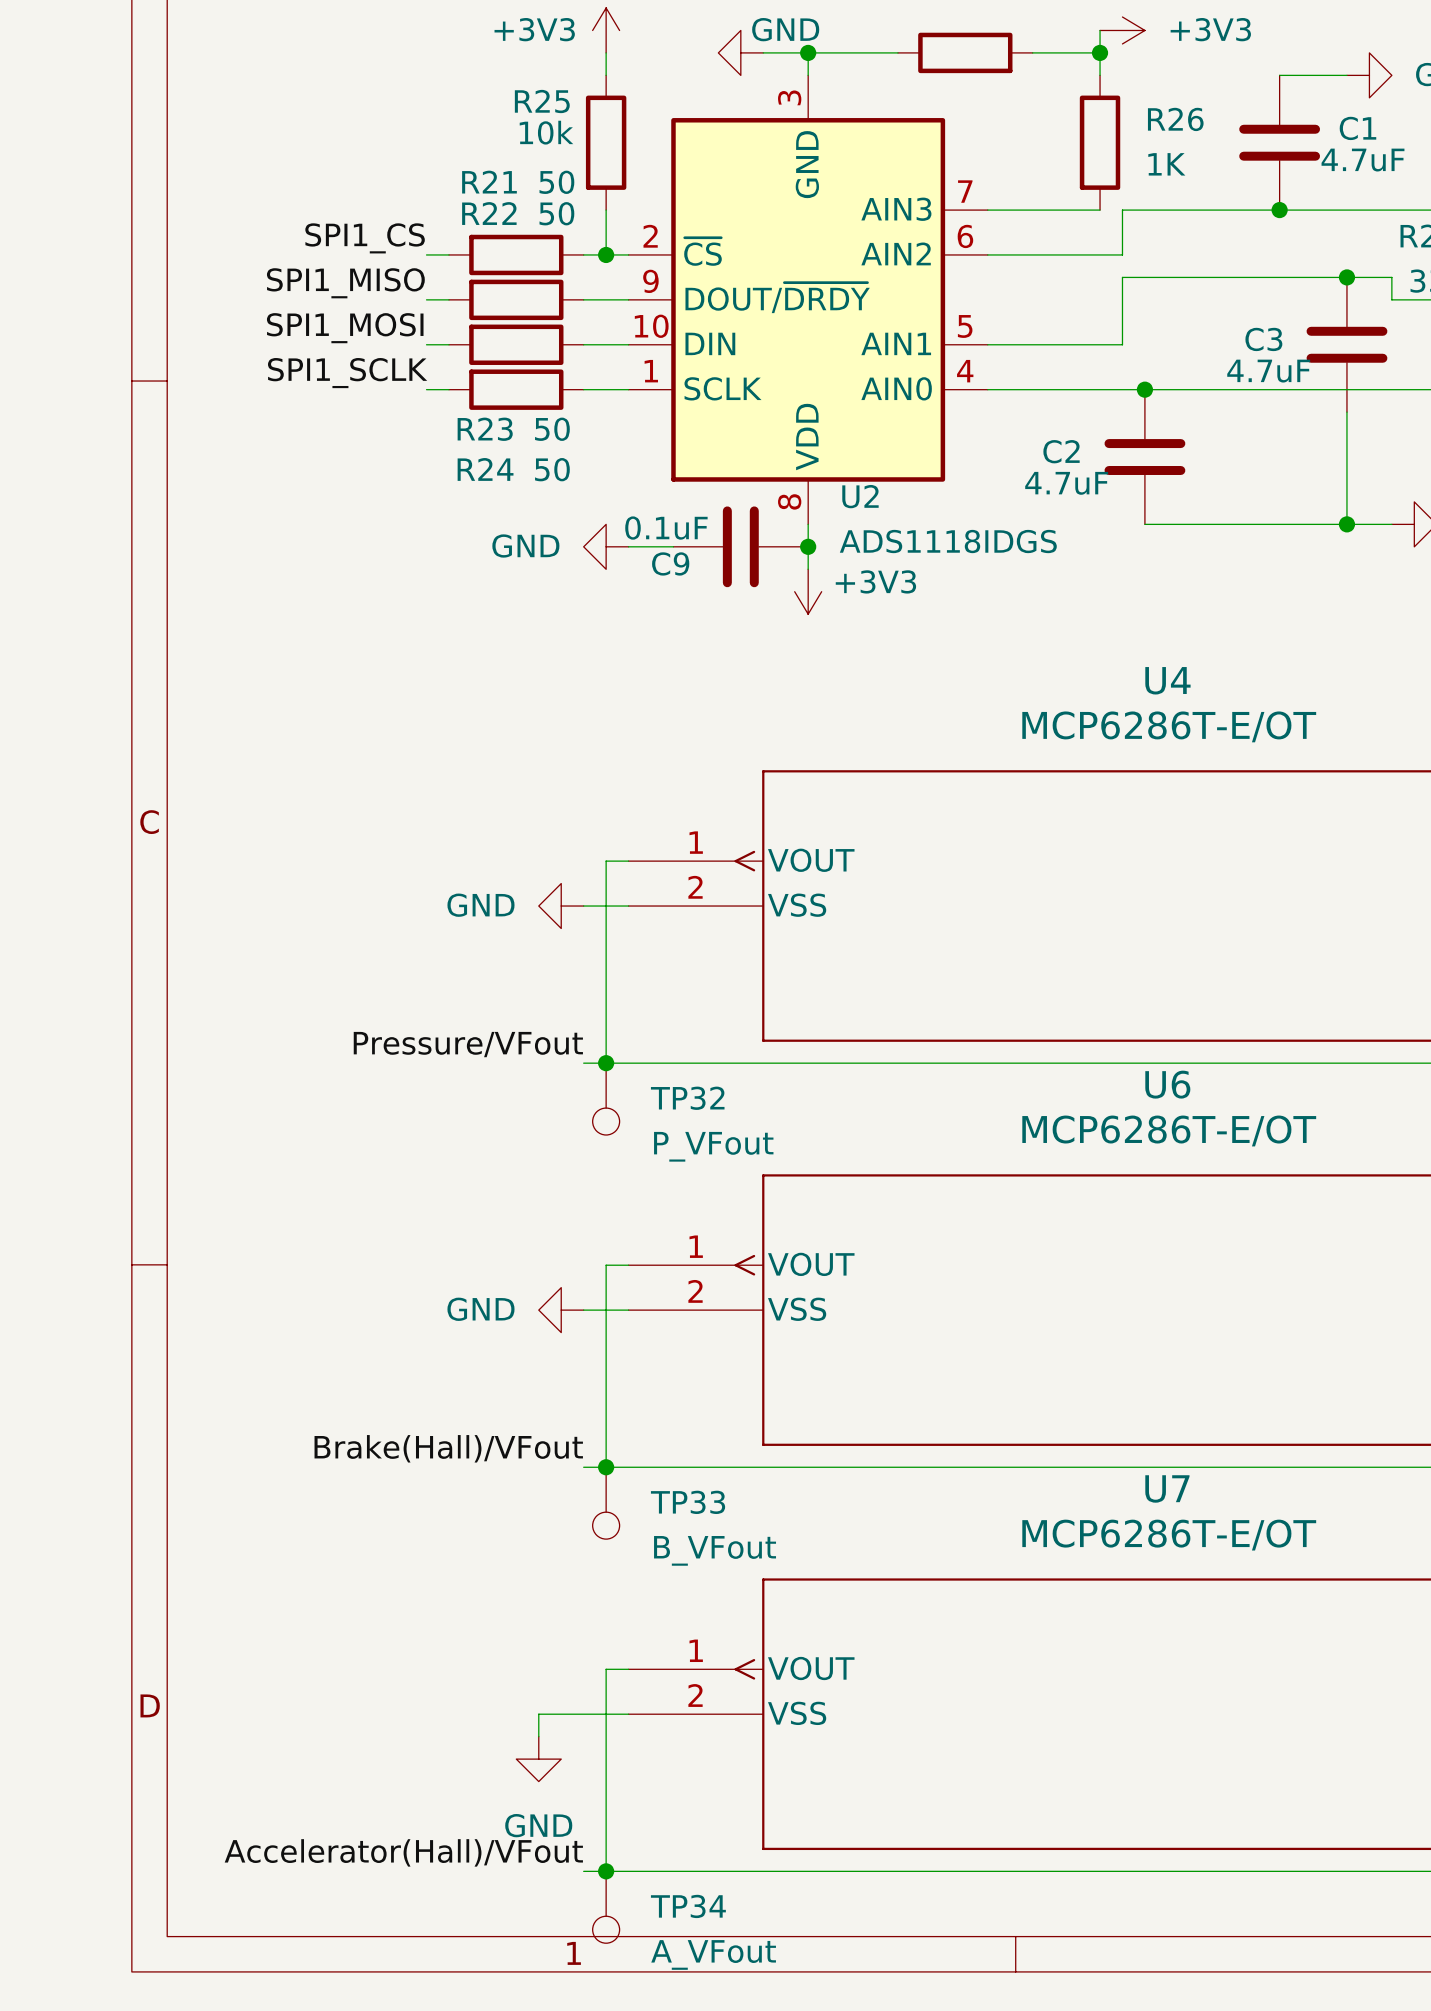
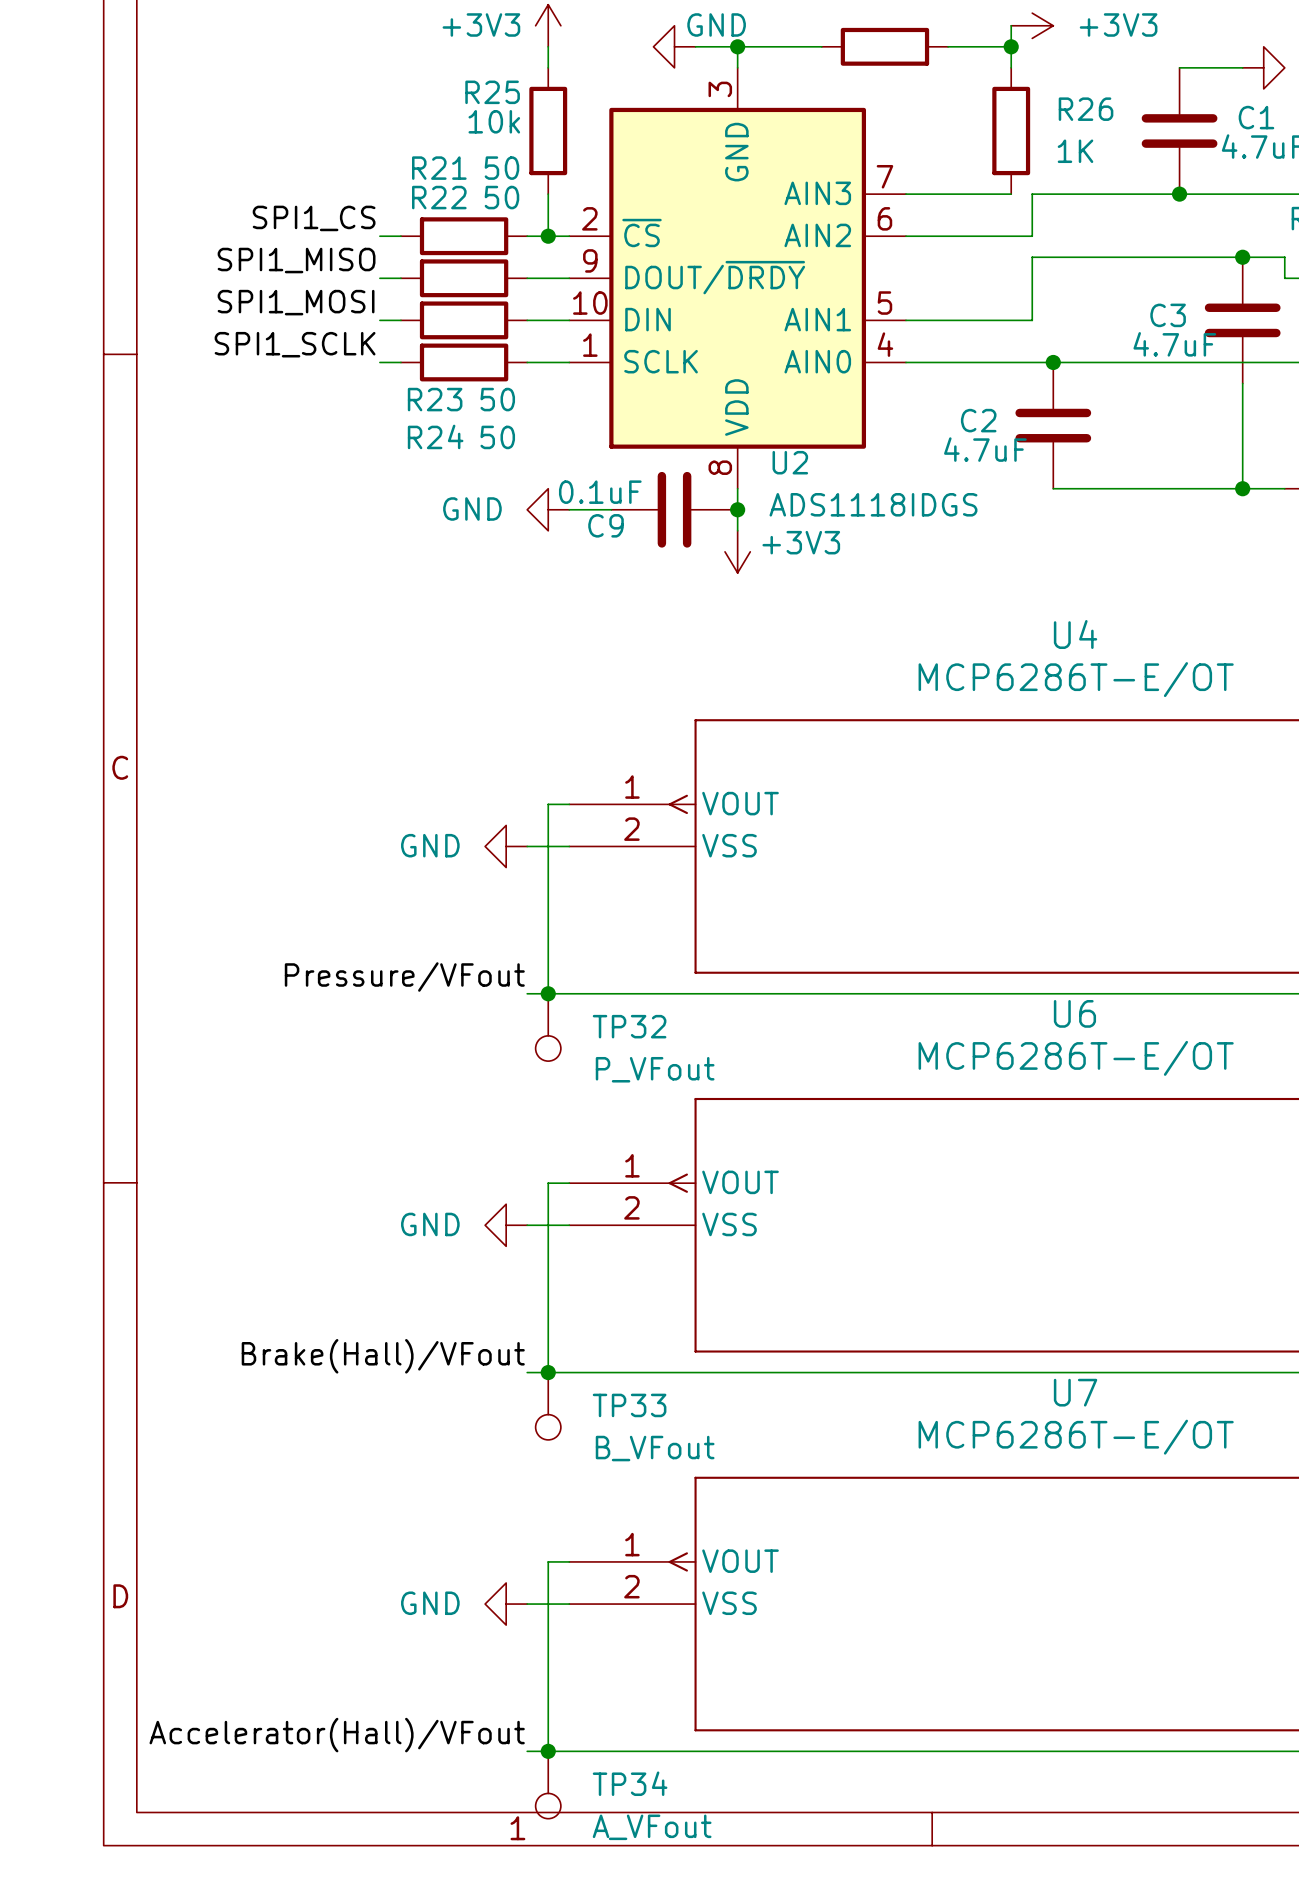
wire: (583, 1714) (538, 1714) (538, 1736) -> none
power symbol rotation: 0° (538, 1759) -> 90° clockwise (506, 1604)
power symbol position: GND (538, 1759) -> GND (506, 1604)

